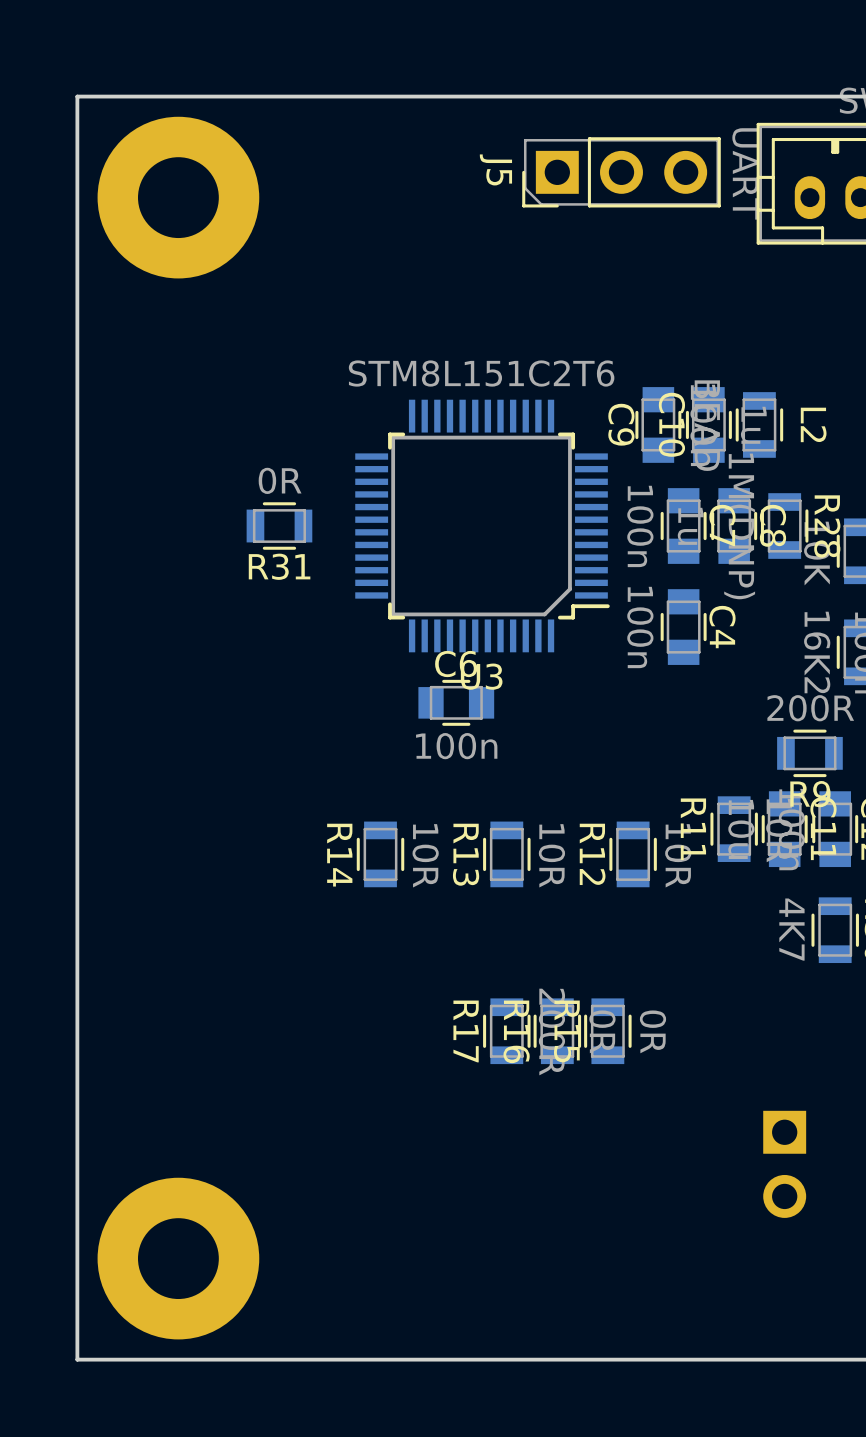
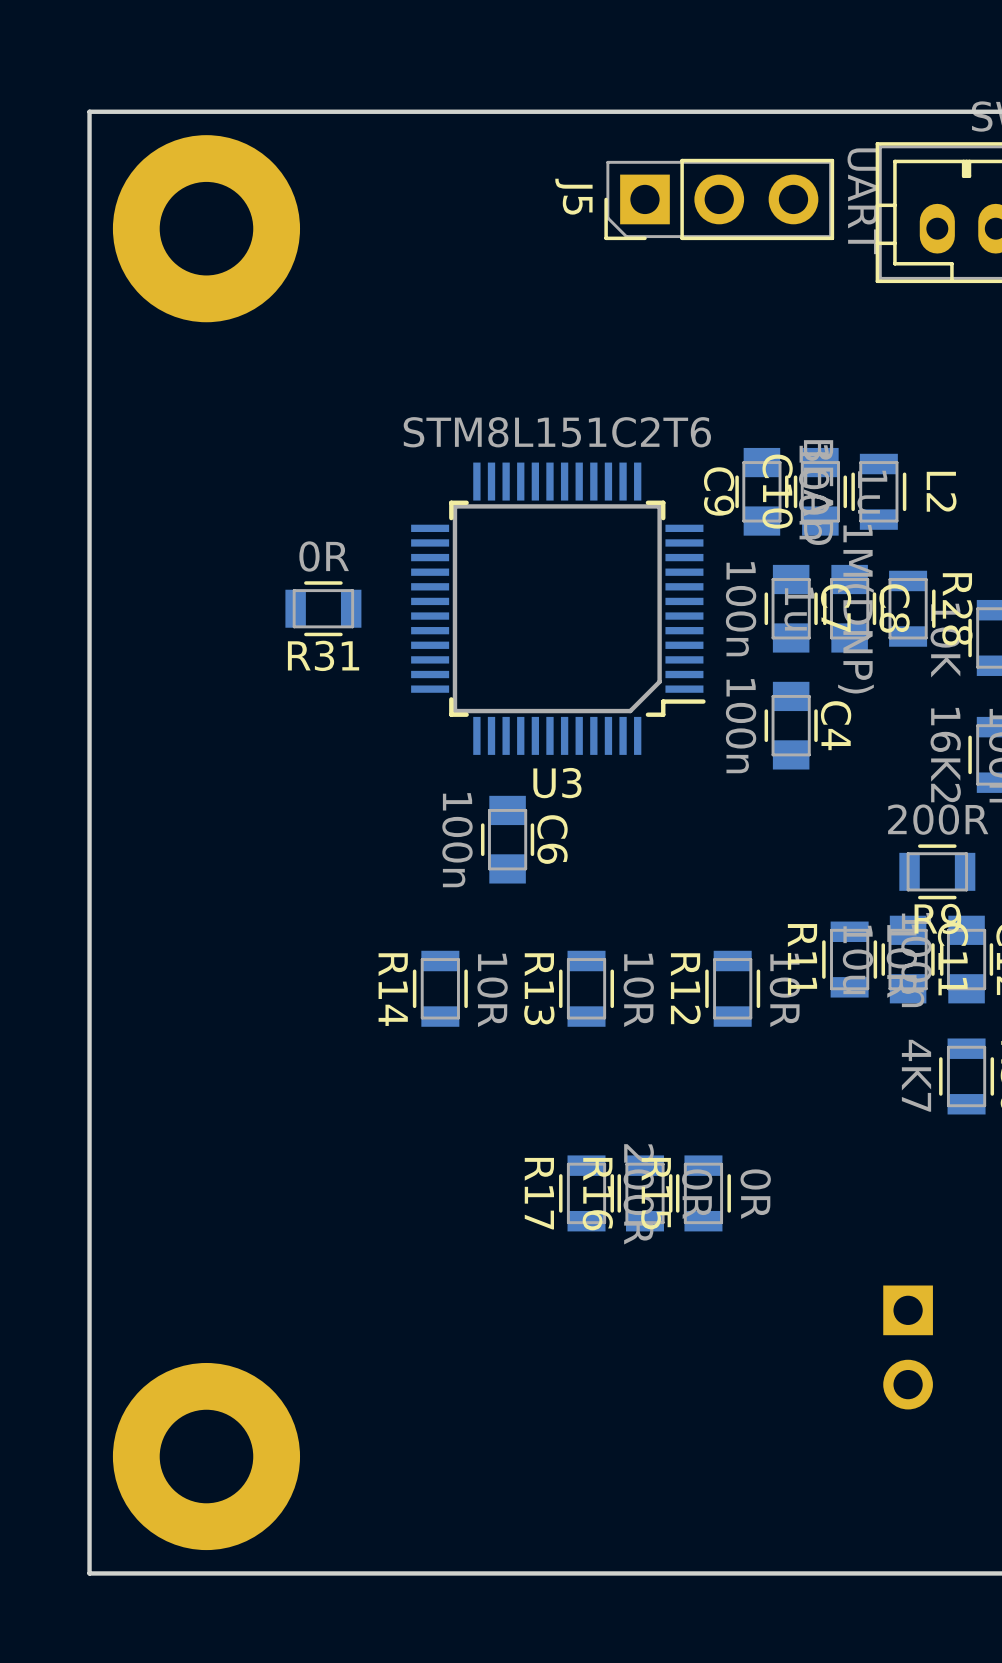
C6 rotation: 0° (456, 702) -> 90° clockwise (507, 839)

